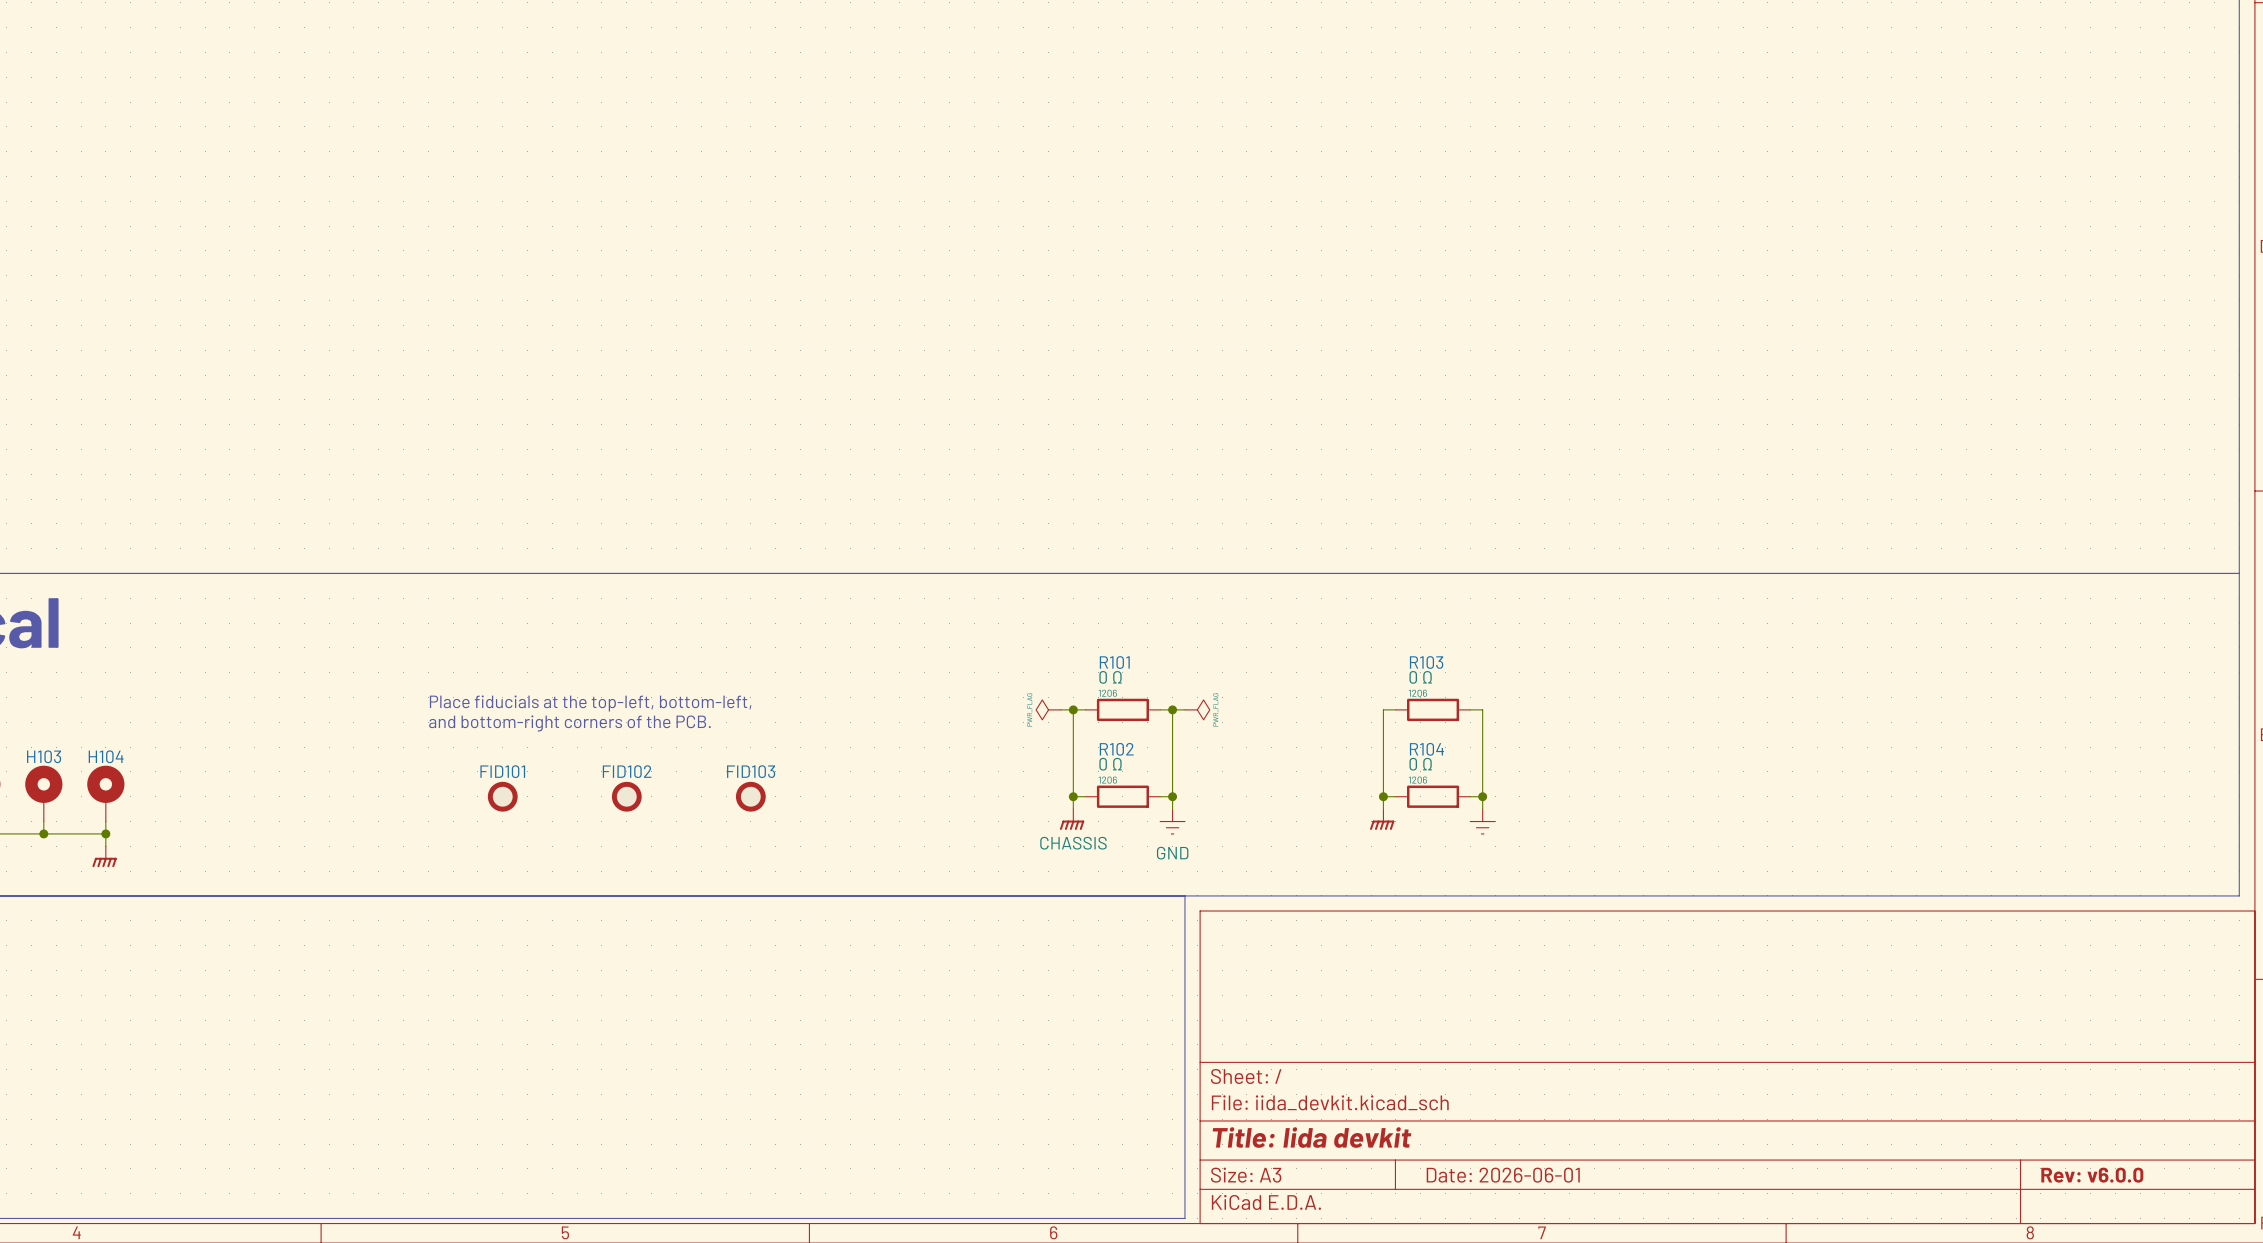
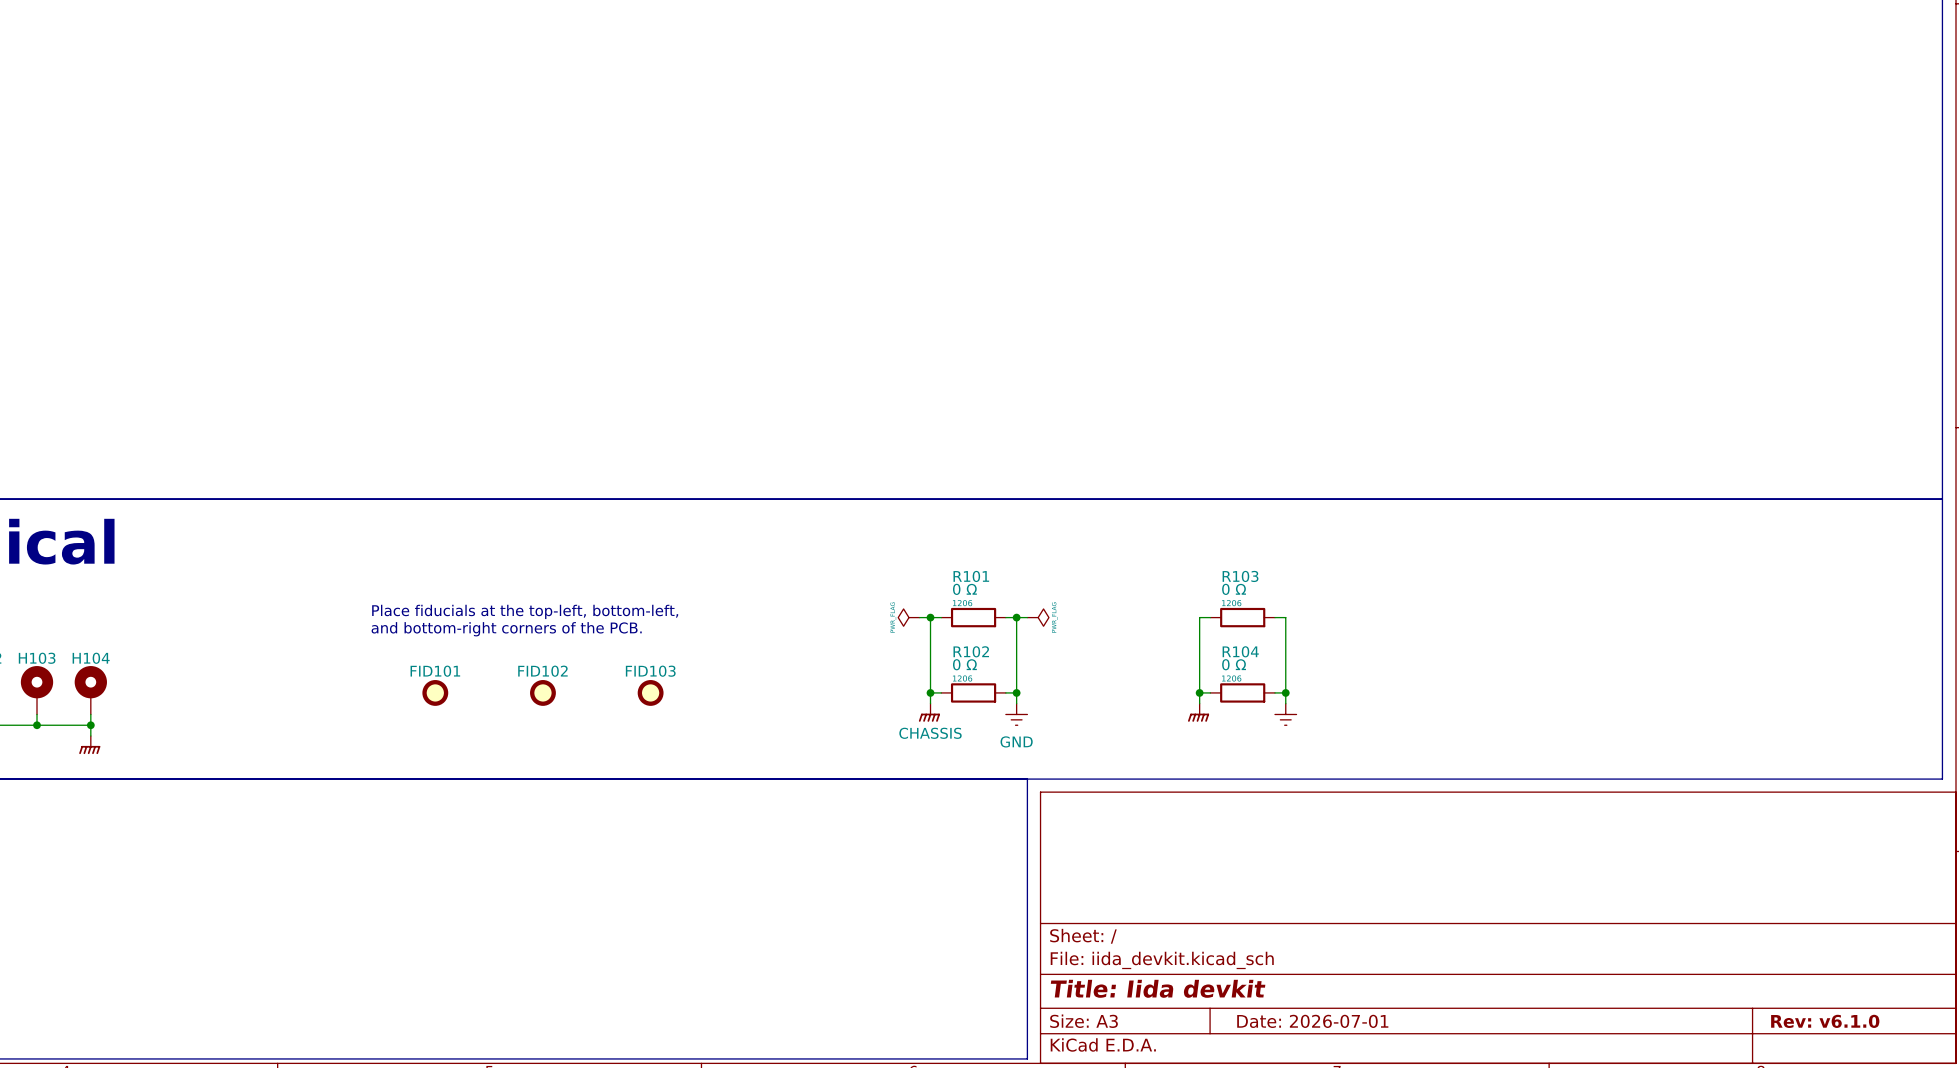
title block: Date: 2026-06-01 (1503, 1175) -> Date: 2026-07-01 (1312, 1021)
title block: Rev: v6.0.0 (2092, 1175) -> Rev: v6.1.0 (1825, 1021)

